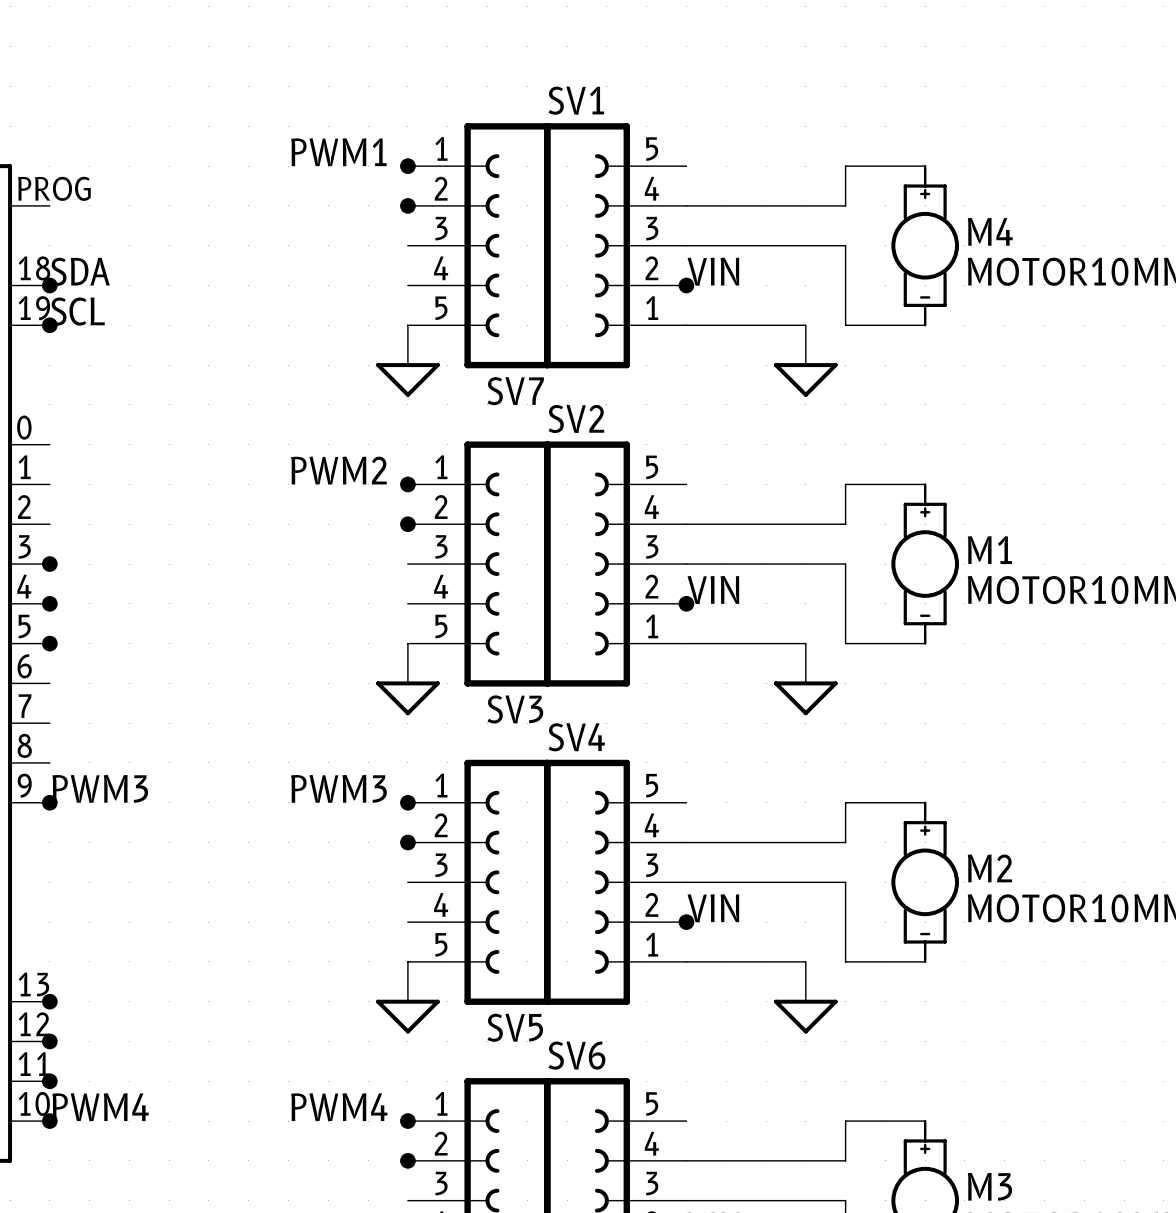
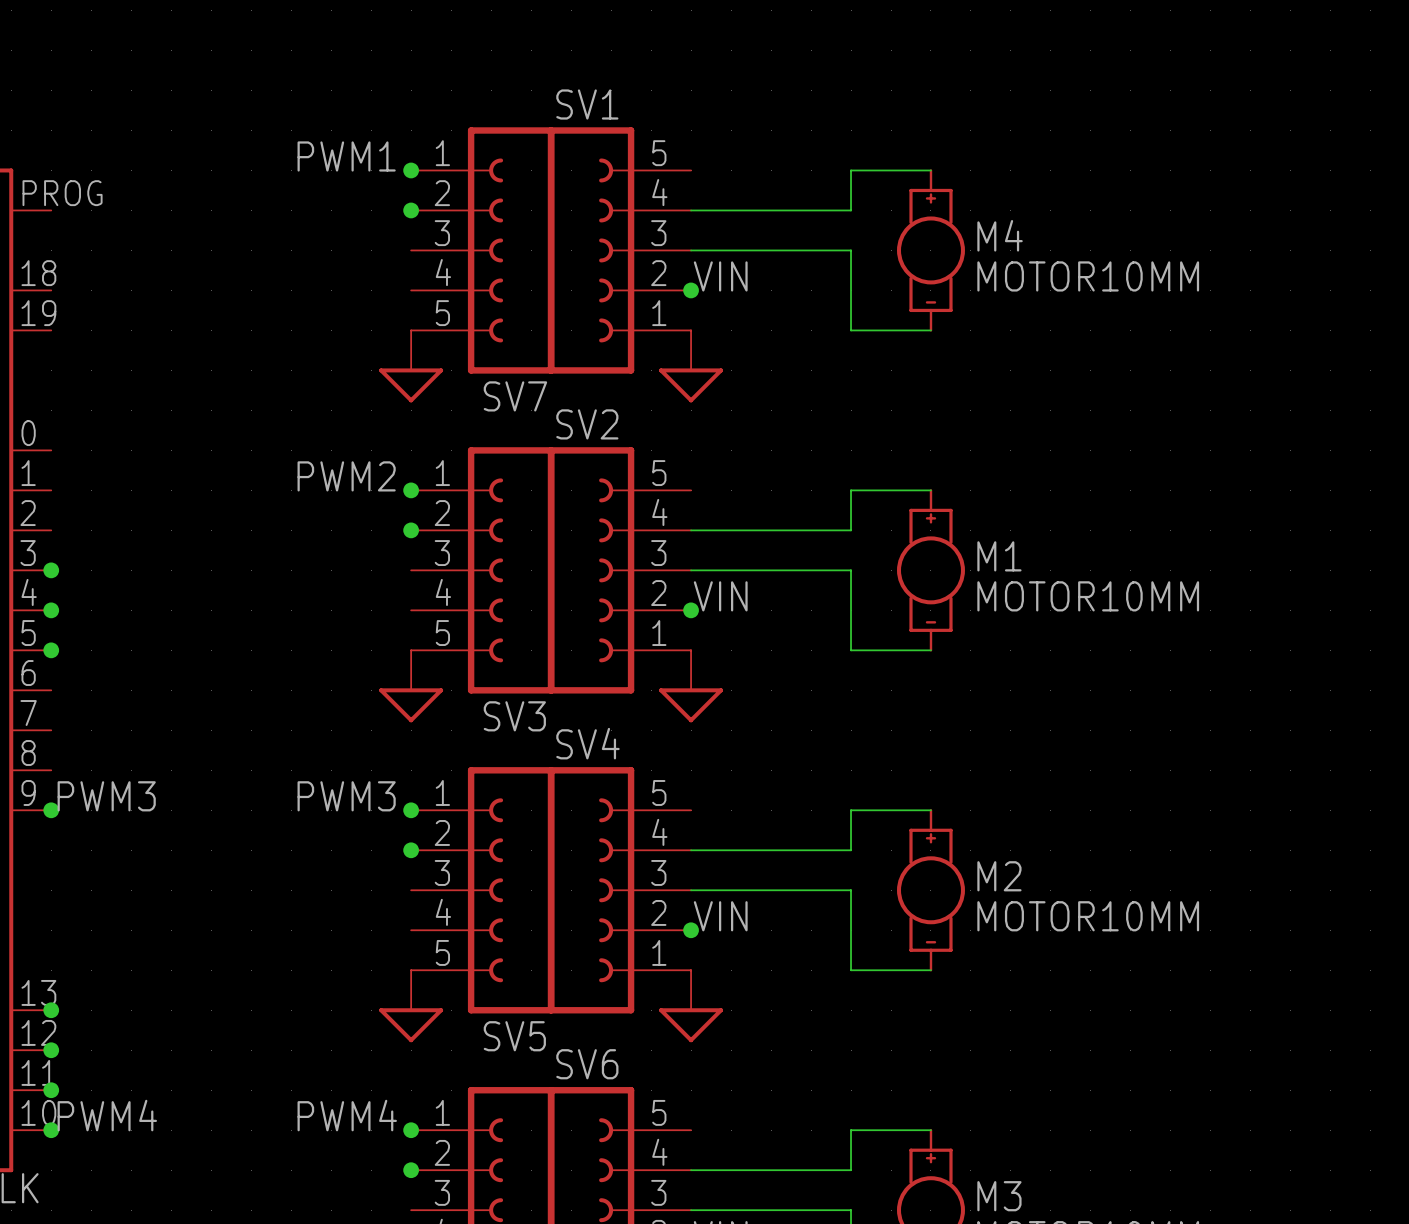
label: SDA (80, 271) -> none
junction: (49, 285) -> none
label: SCL (78, 311) -> none
junction: (49, 325) -> none
wire: (686, 325) (805, 325) -> none
power symbol position: (805, 361) -> (691, 366)
wire: (686, 643) (805, 643) -> none
power symbol position: (805, 679) -> (691, 686)
wire: (686, 961) (805, 961) -> none
power symbol position: (805, 997) -> (691, 1006)

